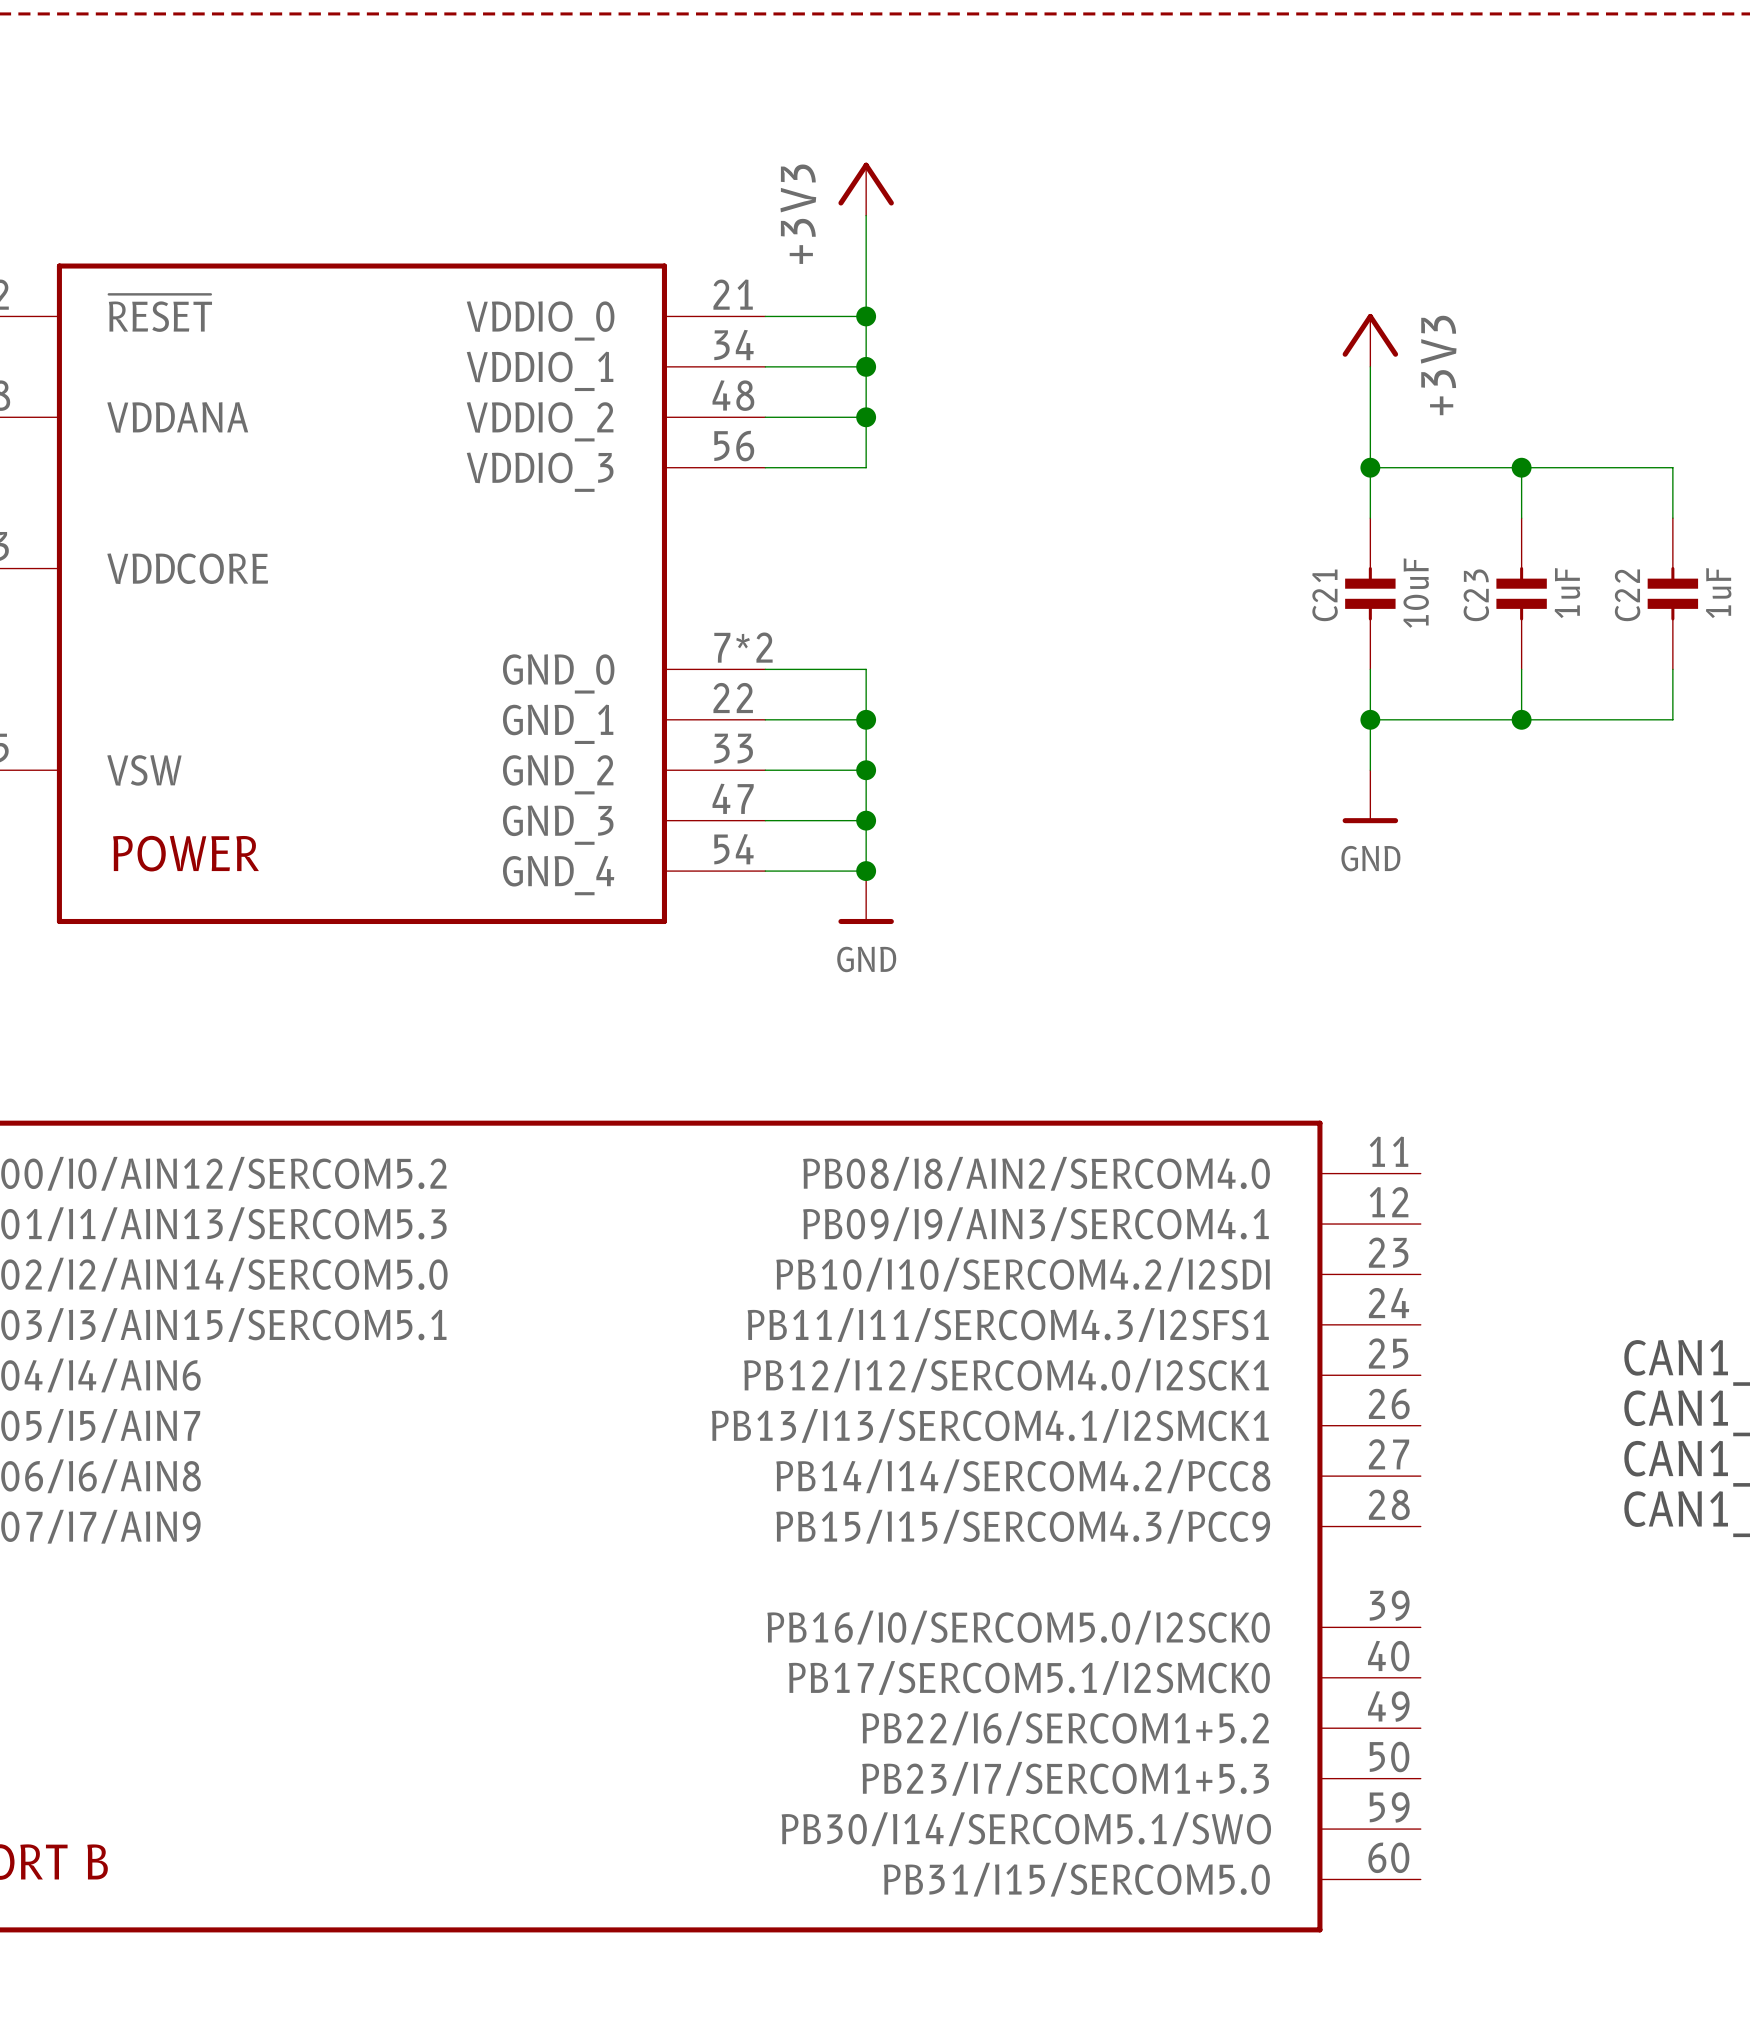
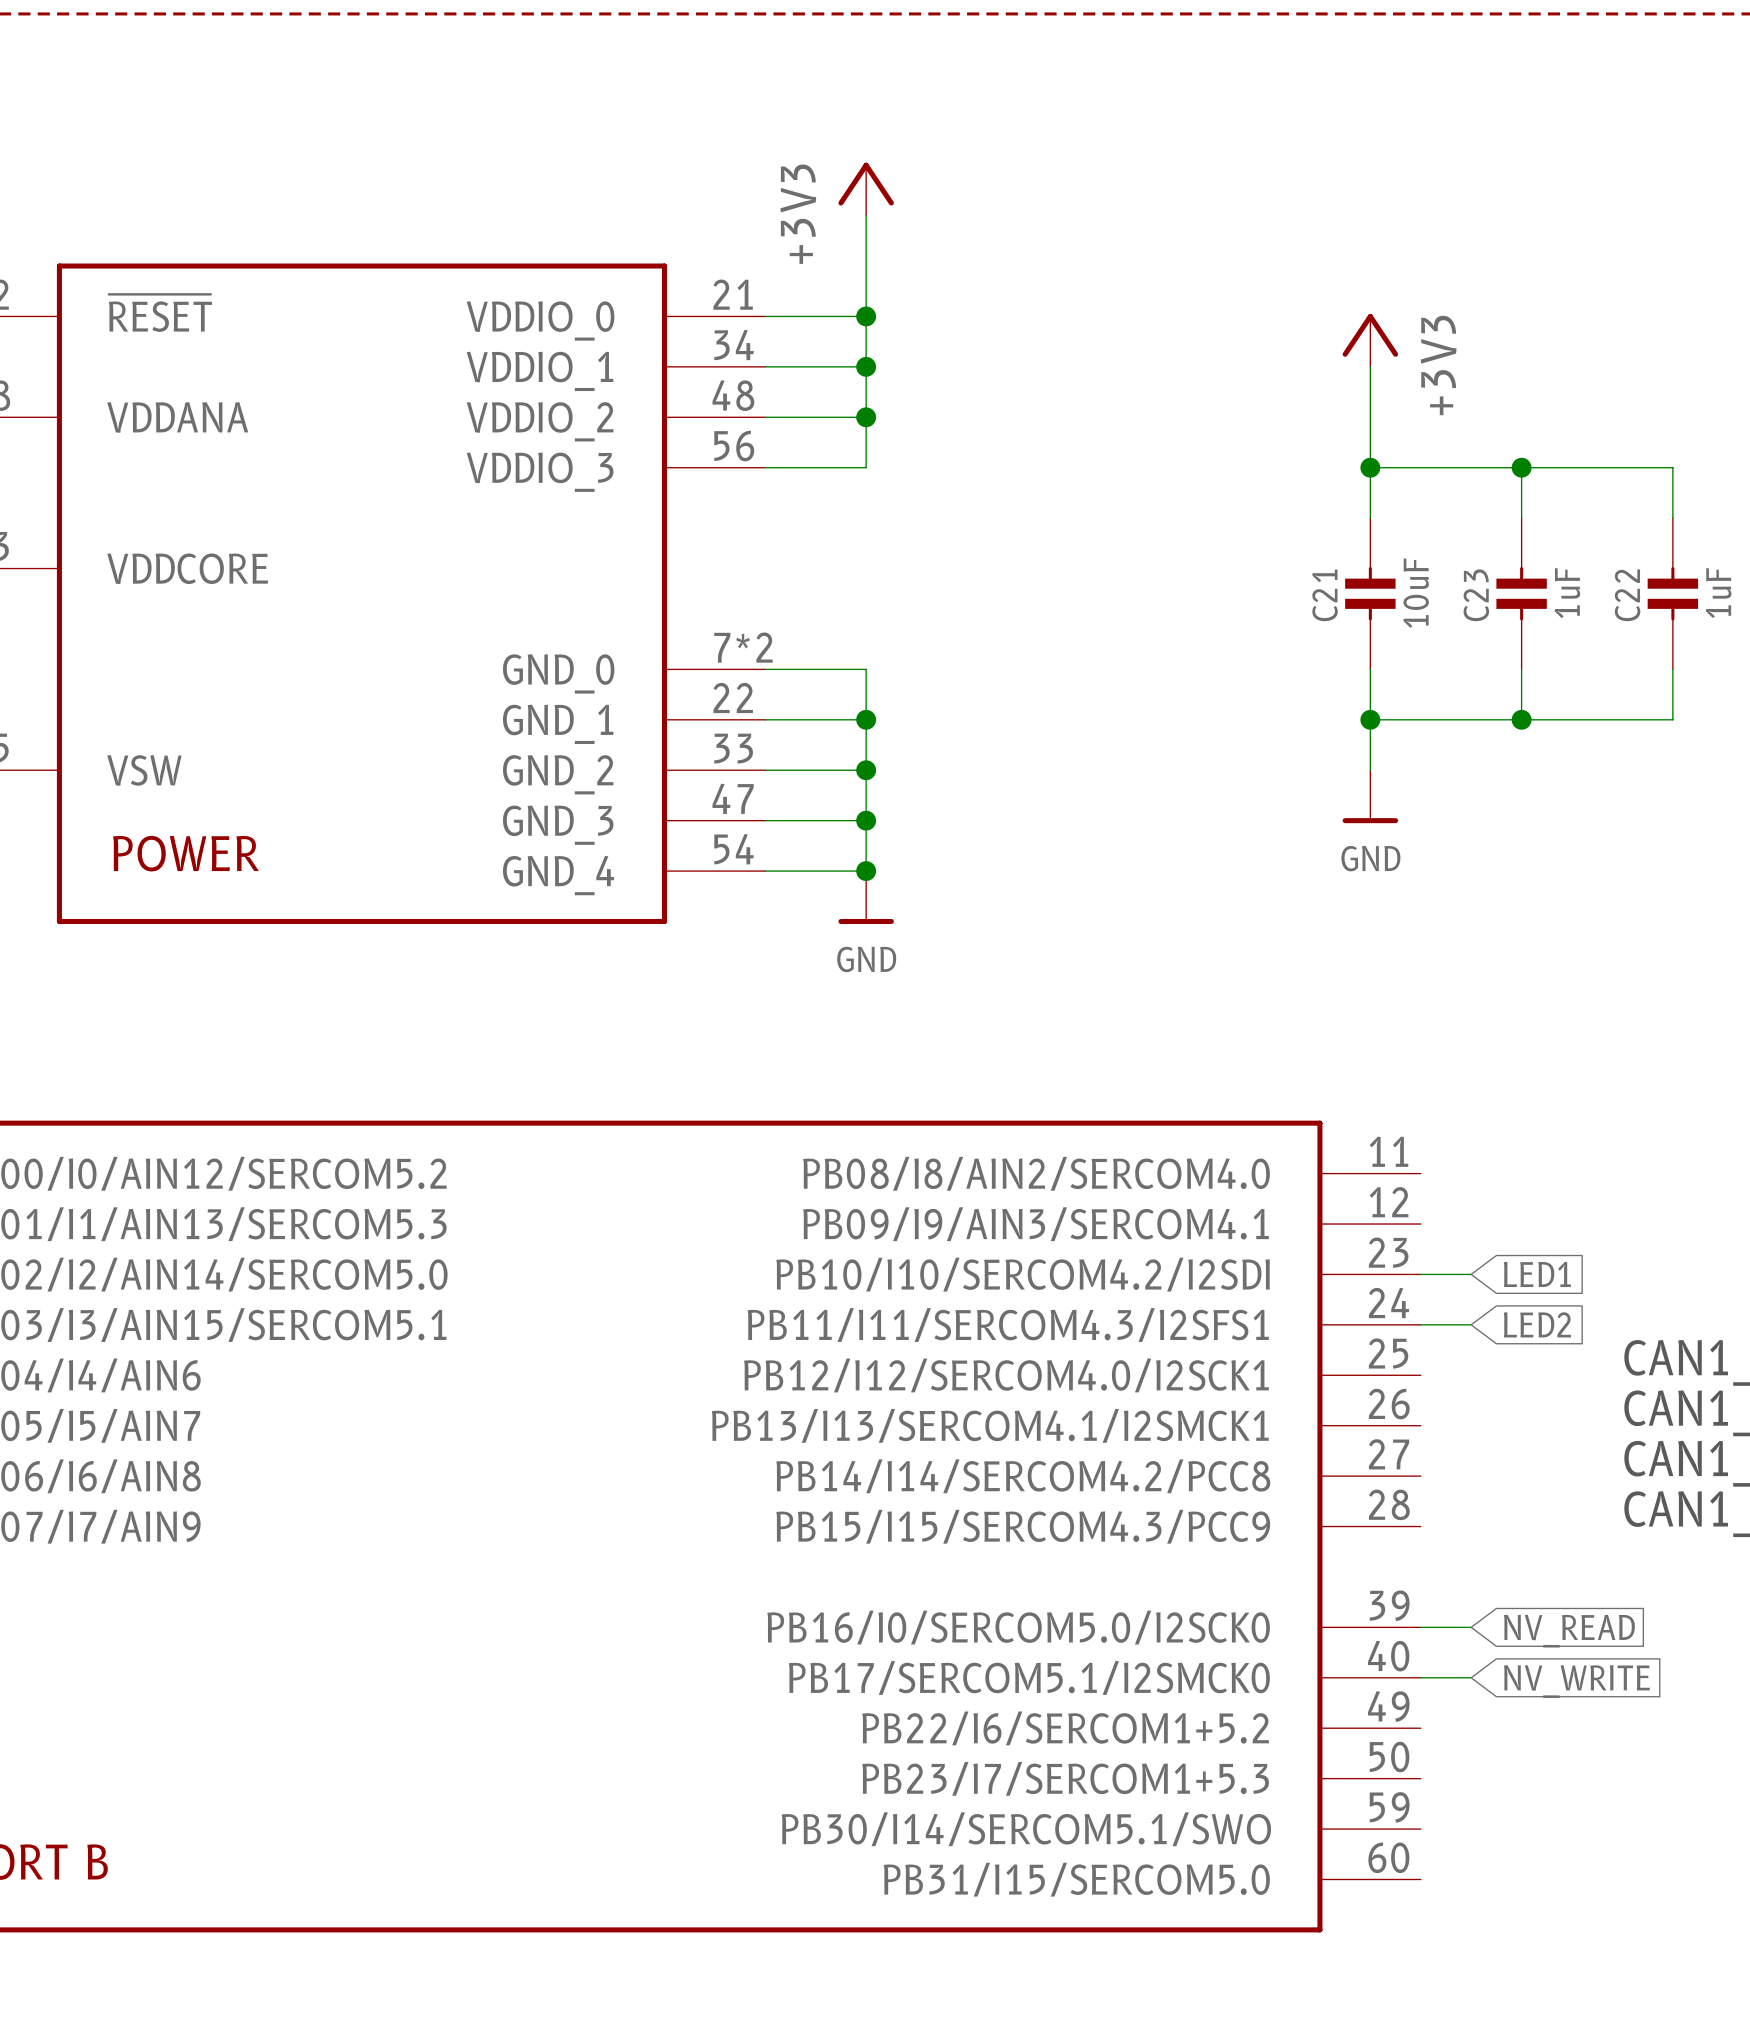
wire: none -> (1420, 1274) (1471, 1274)
global label: none -> LED1 (1537, 1274)
wire: none -> (1420, 1324) (1471, 1324)
global label: none -> LED2 (1537, 1324)
wire: none -> (1420, 1627) (1471, 1627)
global label: none -> NV_READ (1569, 1631)
wire: none -> (1420, 1677) (1471, 1677)
global label: none -> NV_WRITE (1576, 1681)

